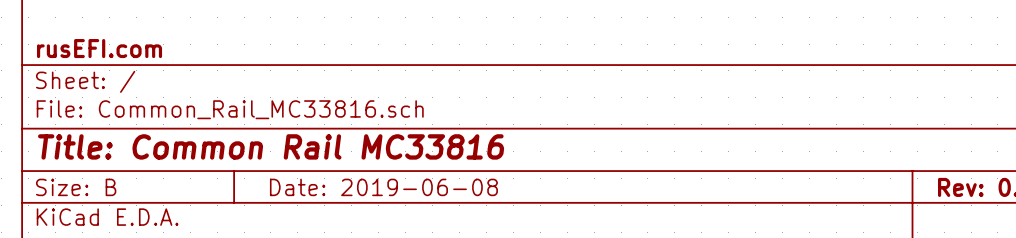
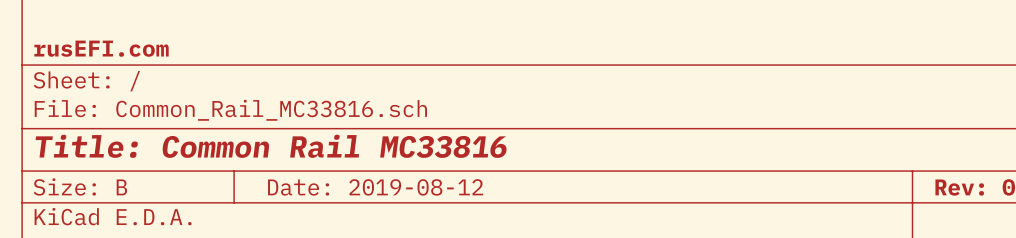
title block: Date: 2019-06-08 (383, 187) -> Date: 2019-08-12 (375, 187)

